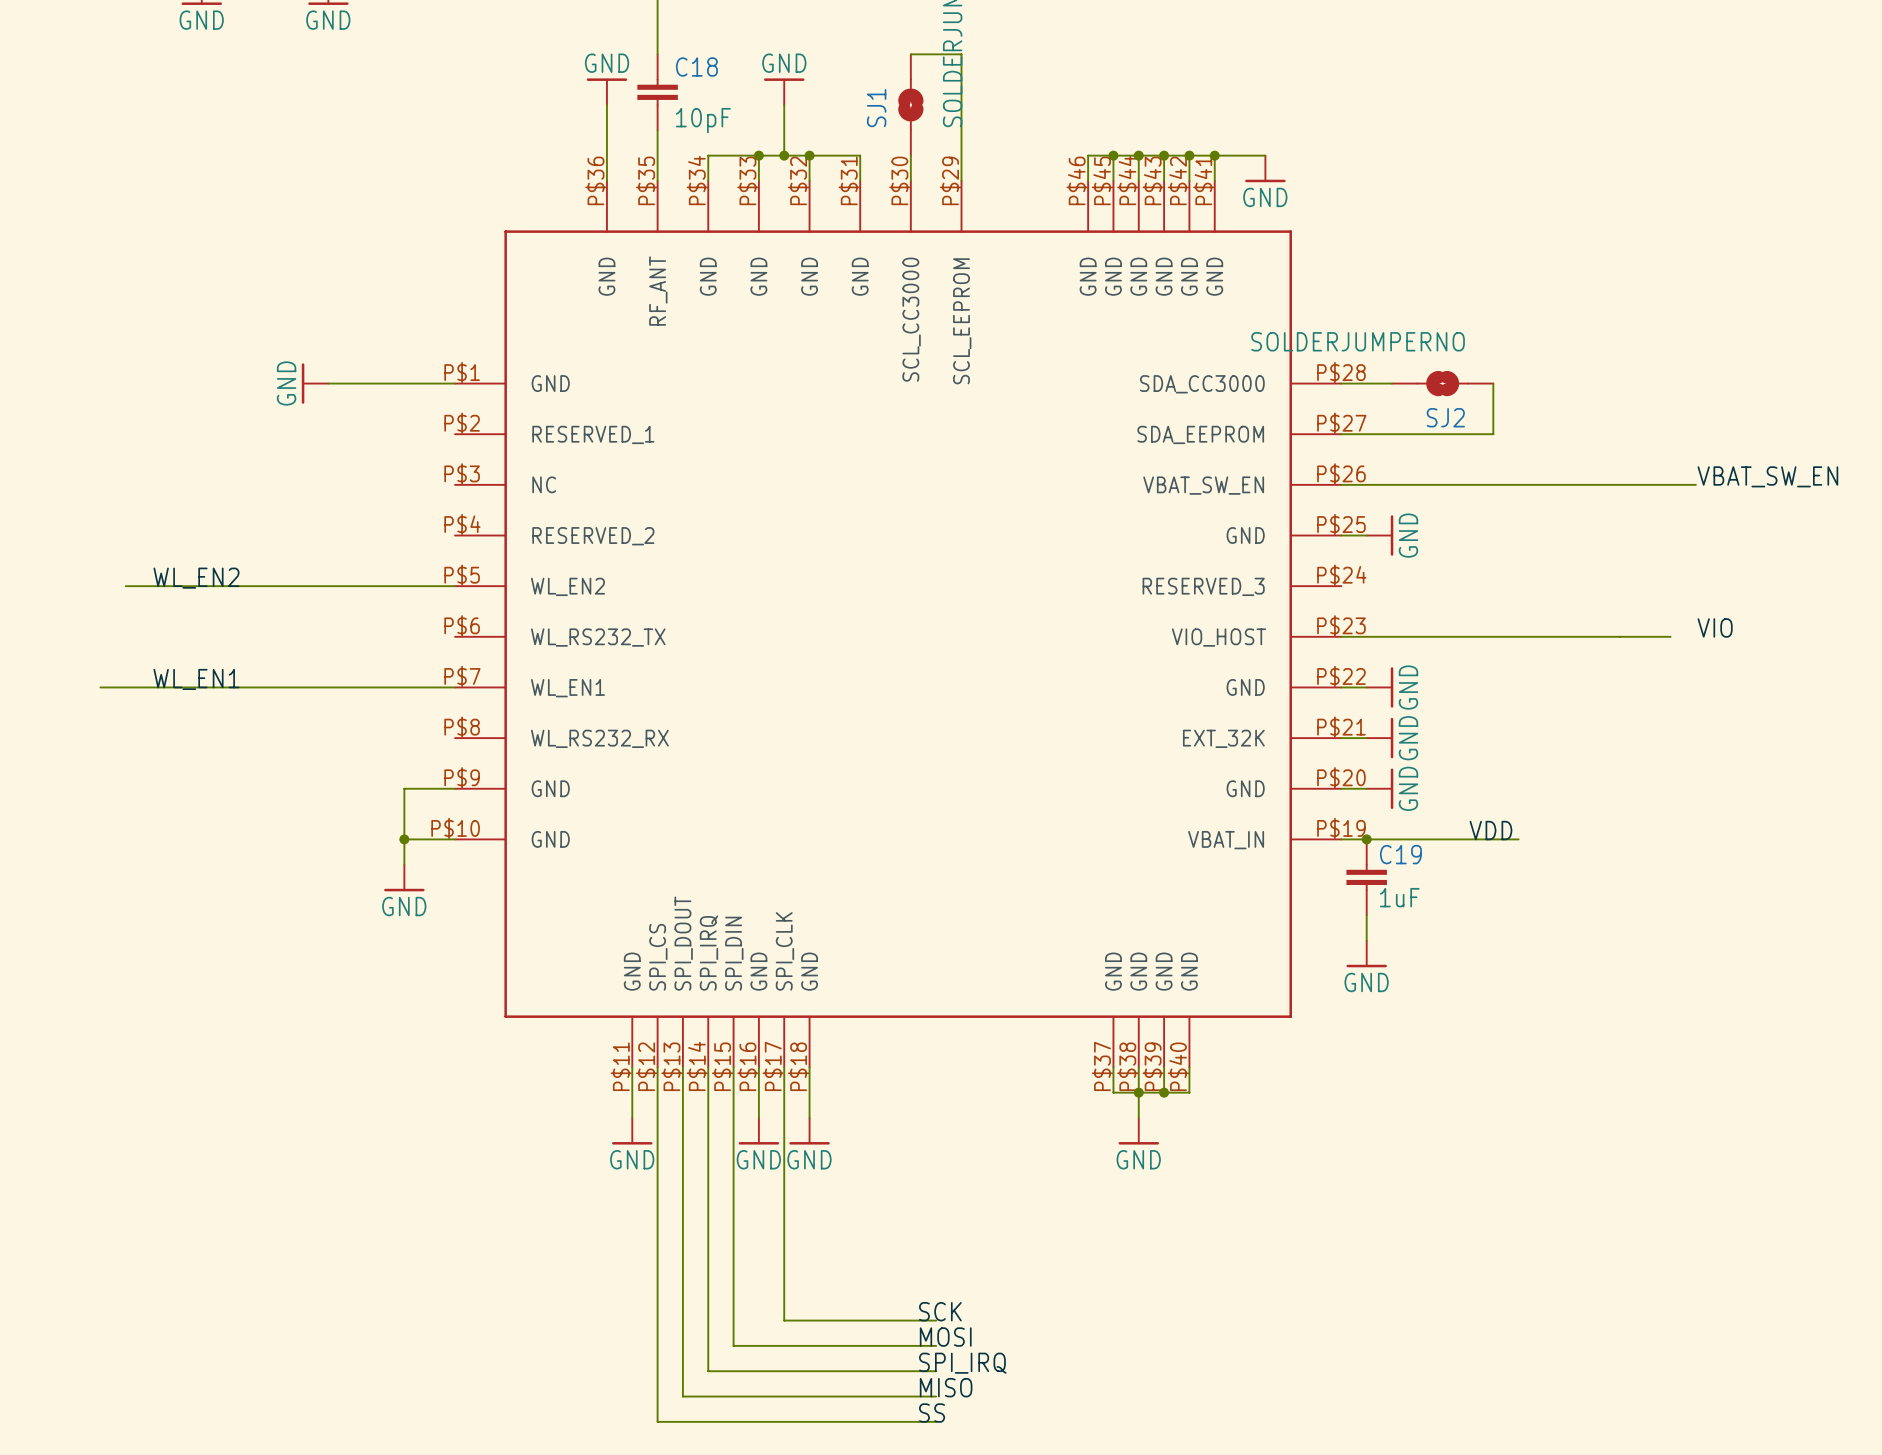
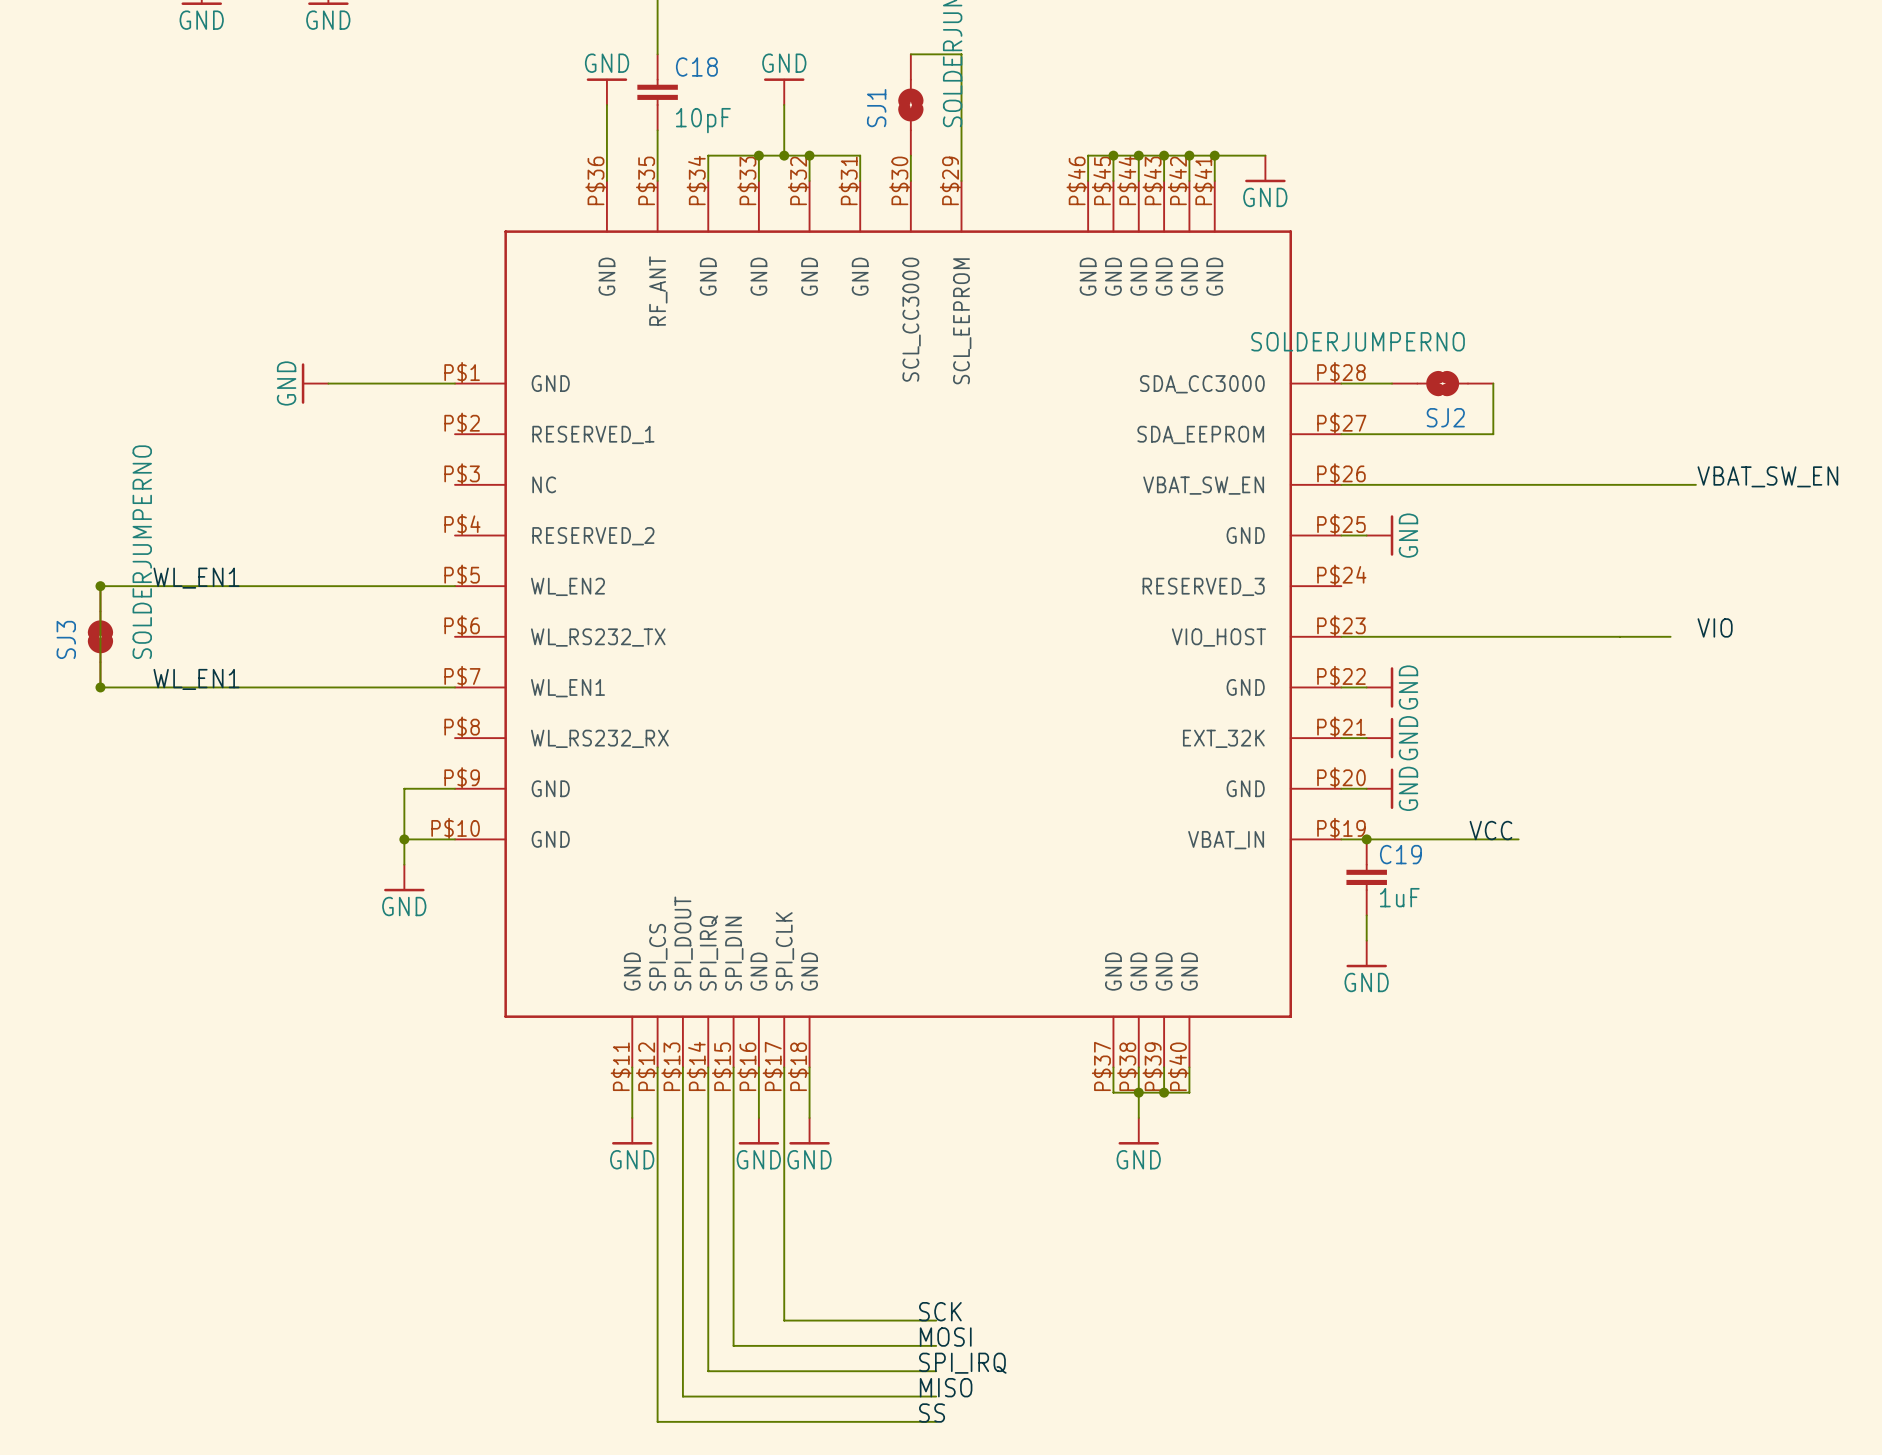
label: WL_EN2 (196, 578) -> WL_EN1 (196, 578)
junction: none -> (100, 586)
wire: none -> (125, 586) (100, 586) (100, 687)
SJ3: none -> SOLDERJUMPERNO (100, 636)
junction: none -> (100, 687)
label: VDD (1490, 830) -> VCC (1490, 830)

